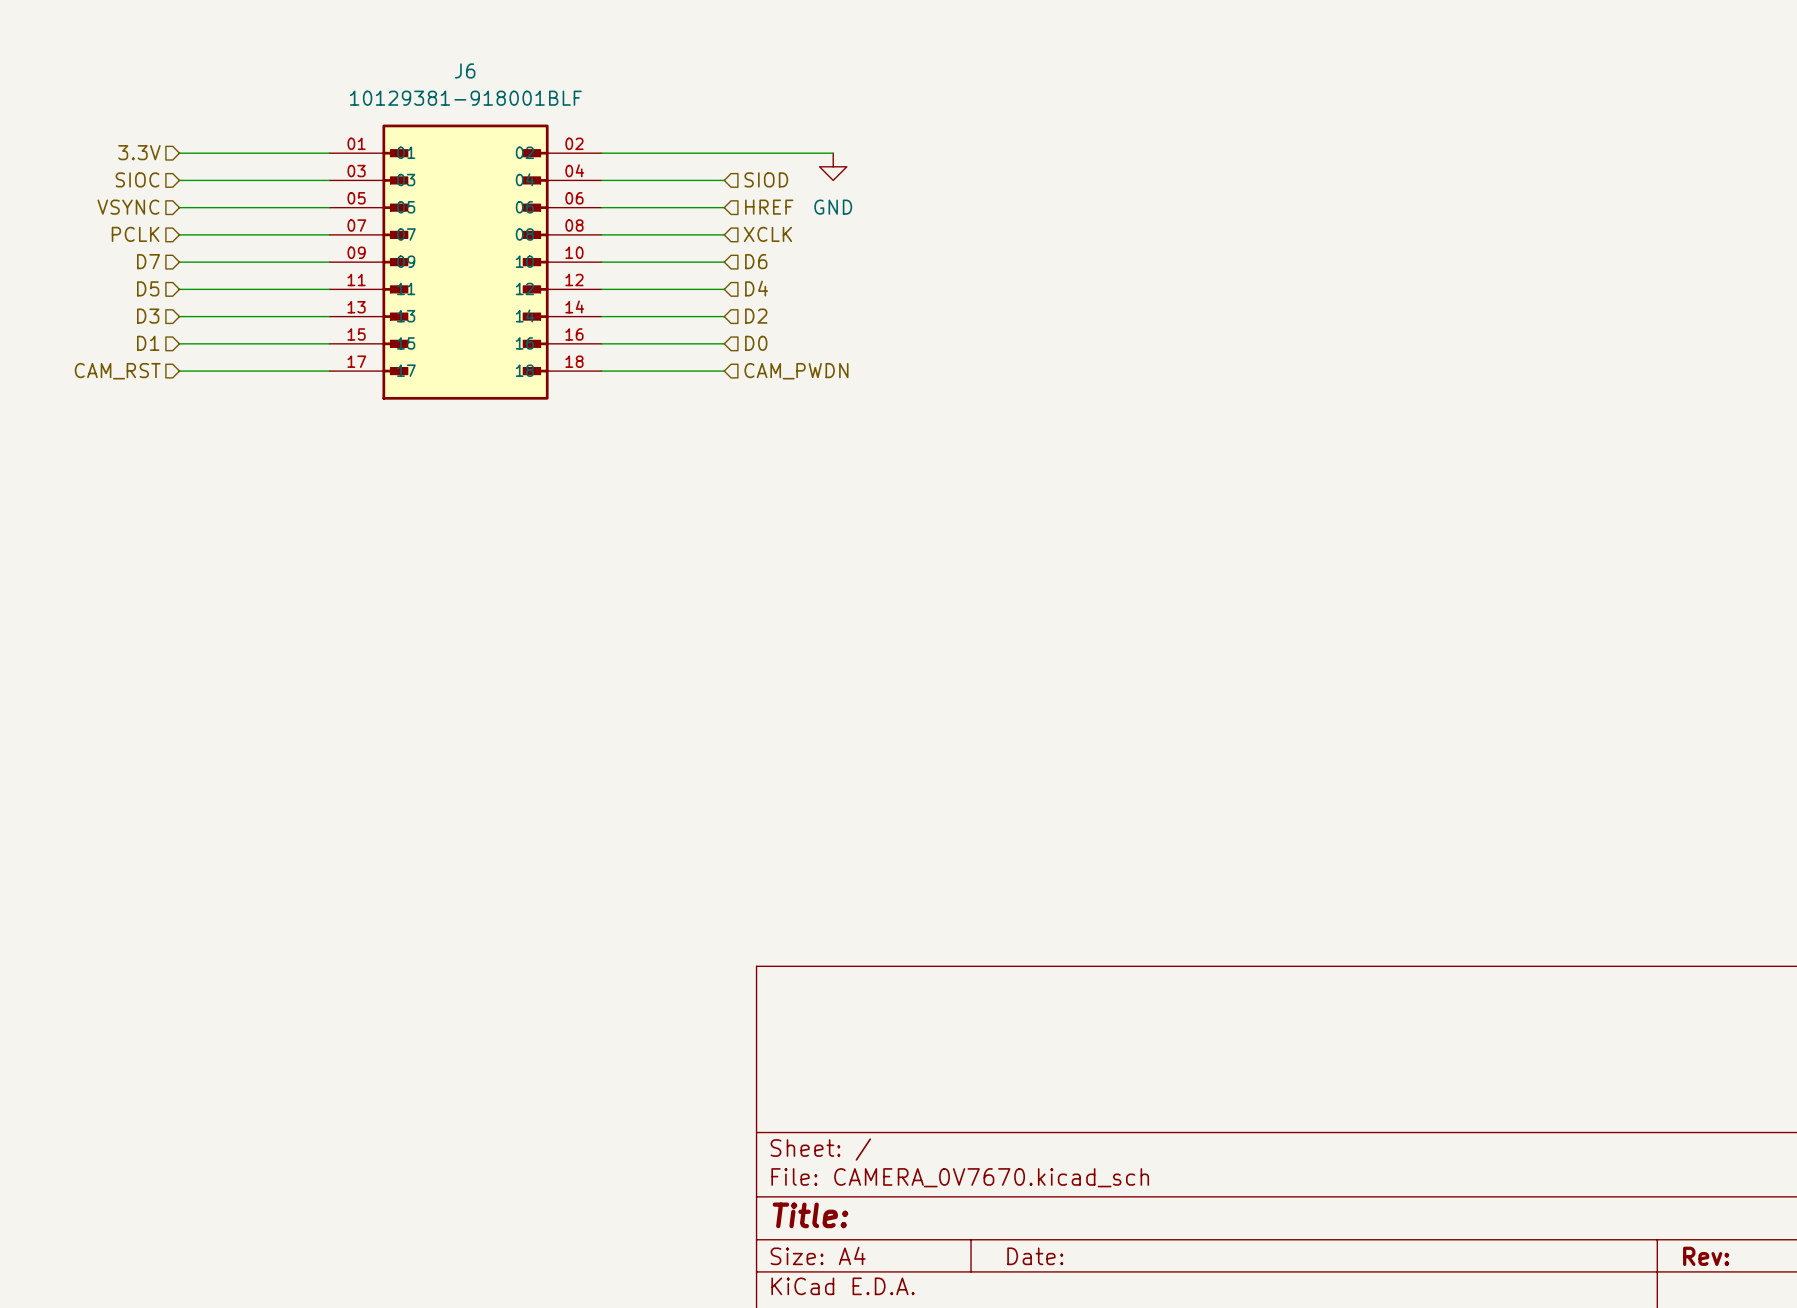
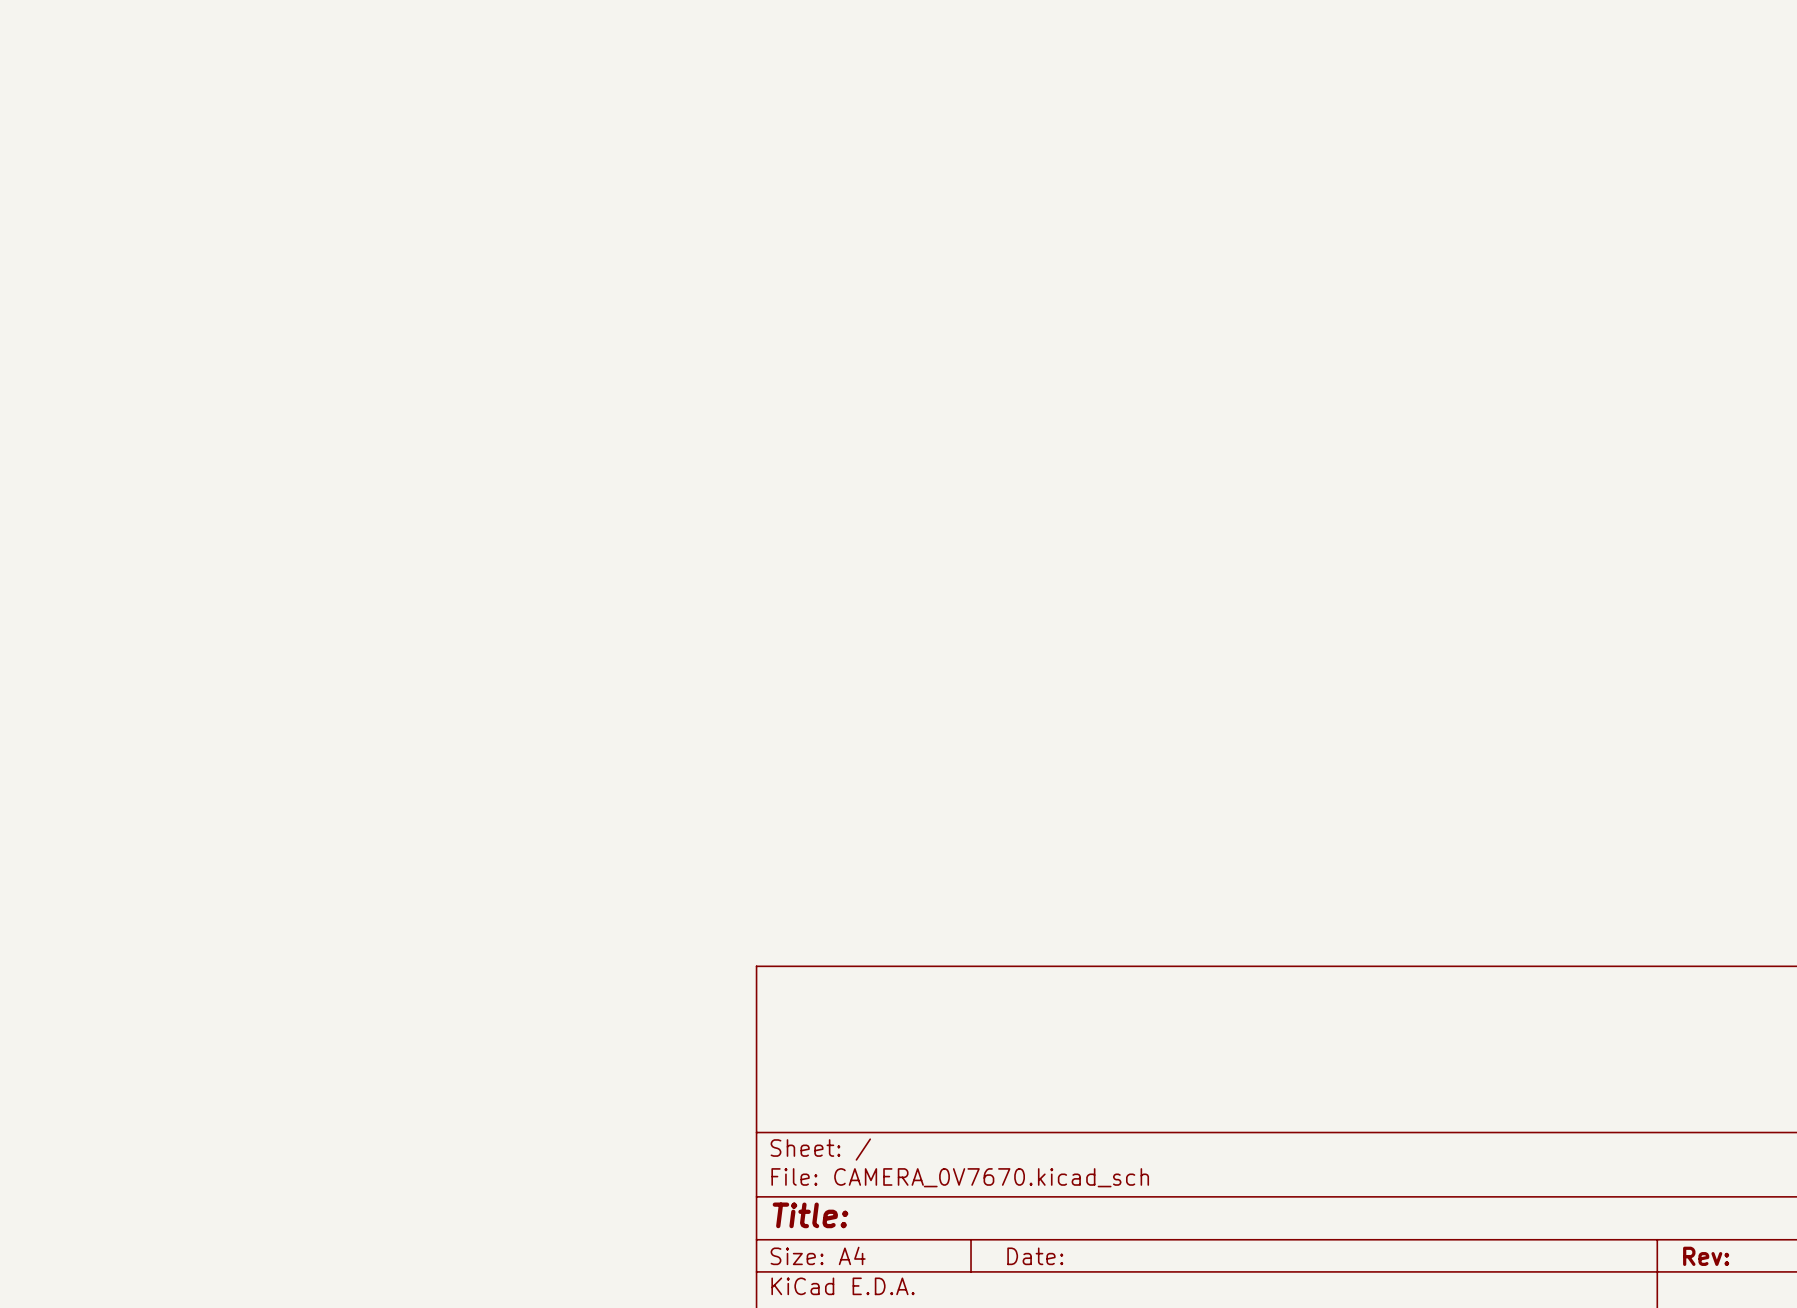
hierarchical label: 3.3V (139, 152) -> none
wire: (179, 153) (329, 153) -> none
wire: (601, 153) (833, 153) -> none
power symbol: GND (833, 166) -> none
hierarchical label: SIOC (137, 179) -> none
hierarchical label: SIOD (766, 179) -> none
wire: (179, 180) (329, 180) -> none
wire: (601, 180) (724, 180) -> none
hierarchical label: VSYNC (128, 207) -> none
wire: (179, 207) (329, 207) -> none
wire: (601, 207) (724, 207) -> none
hierarchical label: HREF (769, 207) -> none
hierarchical label: PCLK (135, 234) -> none
wire: (179, 234) (329, 234) -> none
wire: (601, 234) (724, 234) -> none
hierarchical label: XCLK (767, 234) -> none
hierarchical label: D7 (148, 261) -> none
hierarchical label: D6 (756, 261) -> none
wire: (179, 262) (329, 262) -> none
J6: 10129381-918001BLF (465, 262) -> none
wire: (601, 262) (724, 262) -> none
hierarchical label: D5 (148, 288) -> none
hierarchical label: D4 (756, 288) -> none
wire: (179, 289) (329, 289) -> none
wire: (601, 289) (724, 289) -> none
hierarchical label: D3 (148, 316) -> none
wire: (179, 316) (329, 316) -> none
wire: (601, 316) (724, 316) -> none
hierarchical label: D2 (756, 316) -> none
hierarchical label: D1 (148, 343) -> none
wire: (179, 343) (329, 343) -> none
wire: (601, 343) (724, 343) -> none
hierarchical label: D0 (756, 343) -> none
hierarchical label: CAM_RST (117, 371) -> none
wire: (179, 371) (329, 371) -> none
wire: (601, 371) (724, 371) -> none
hierarchical label: CAM_PWDN (796, 371) -> none

